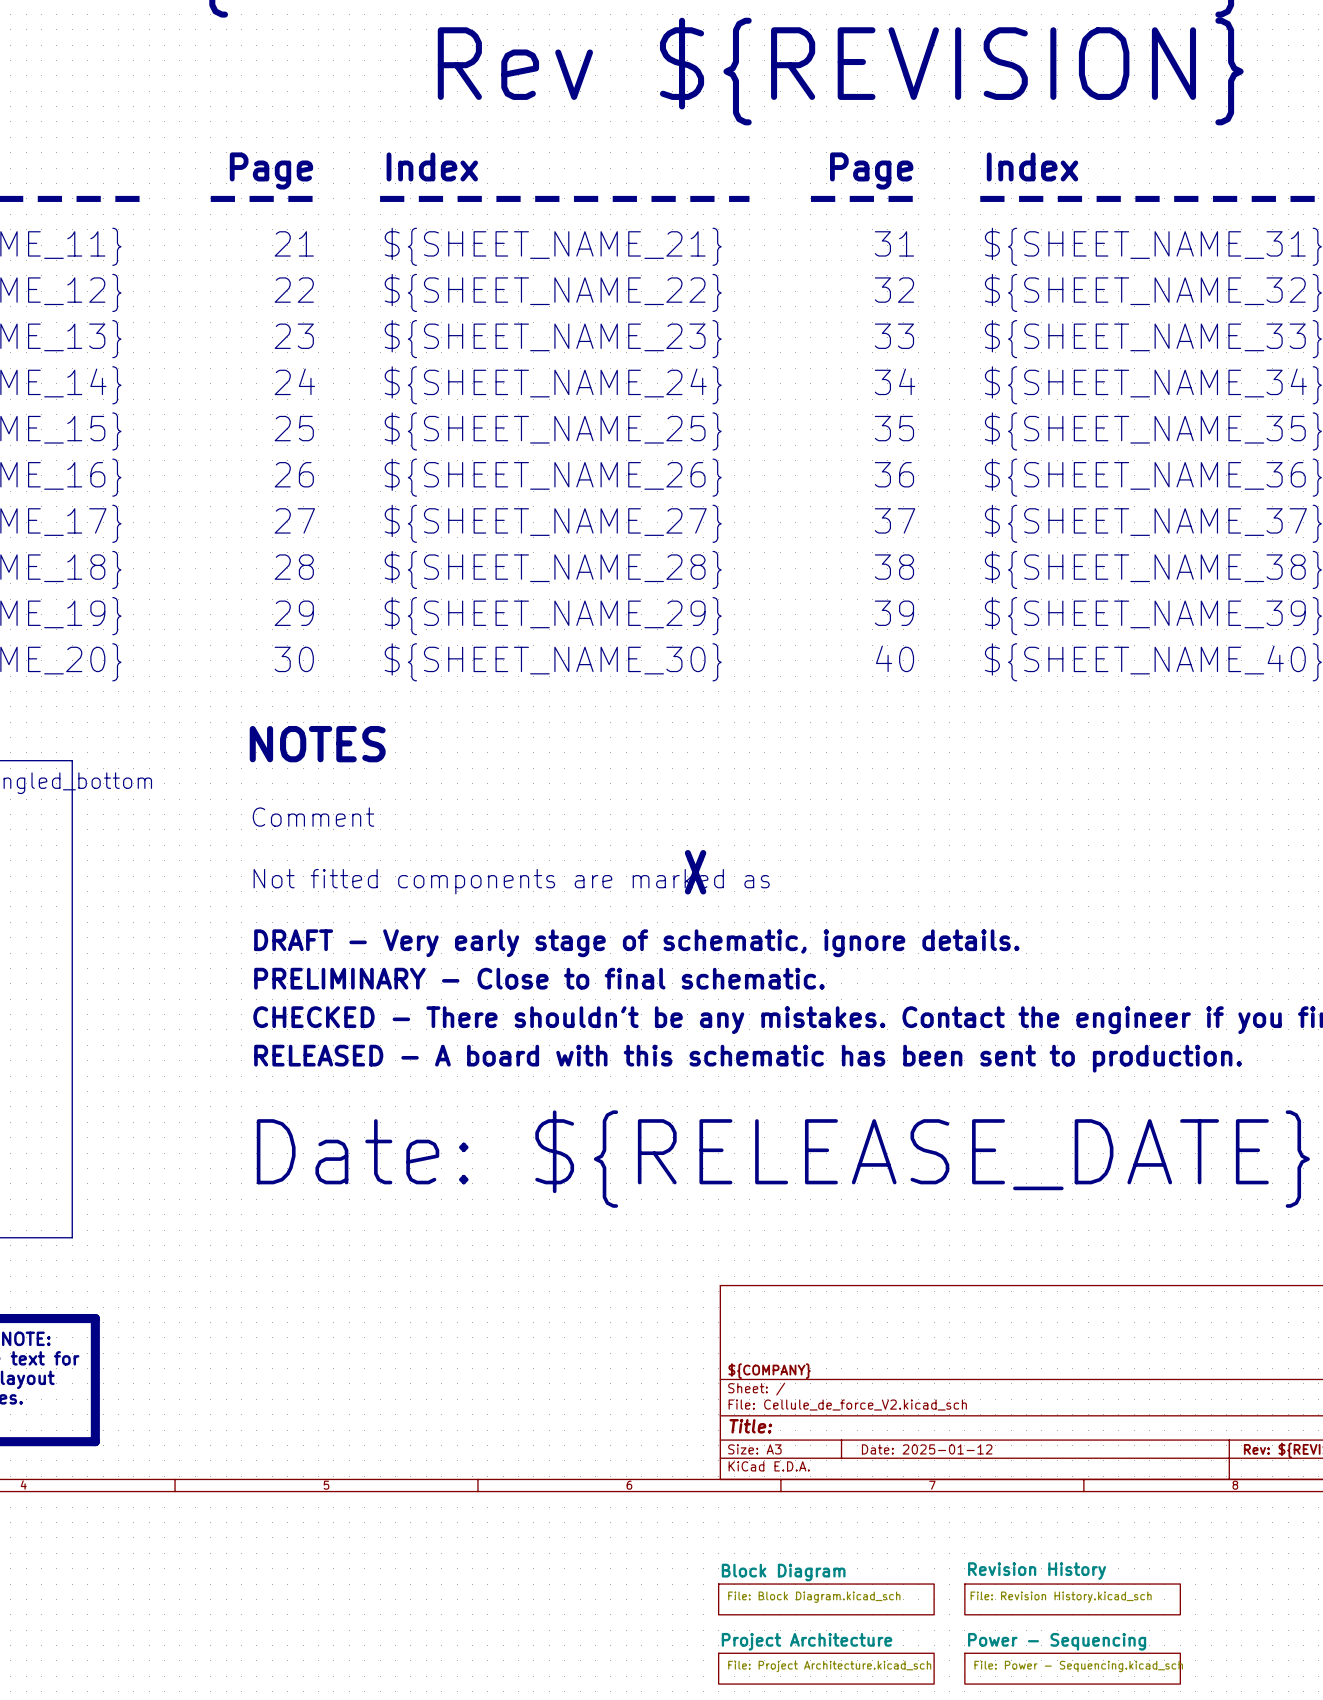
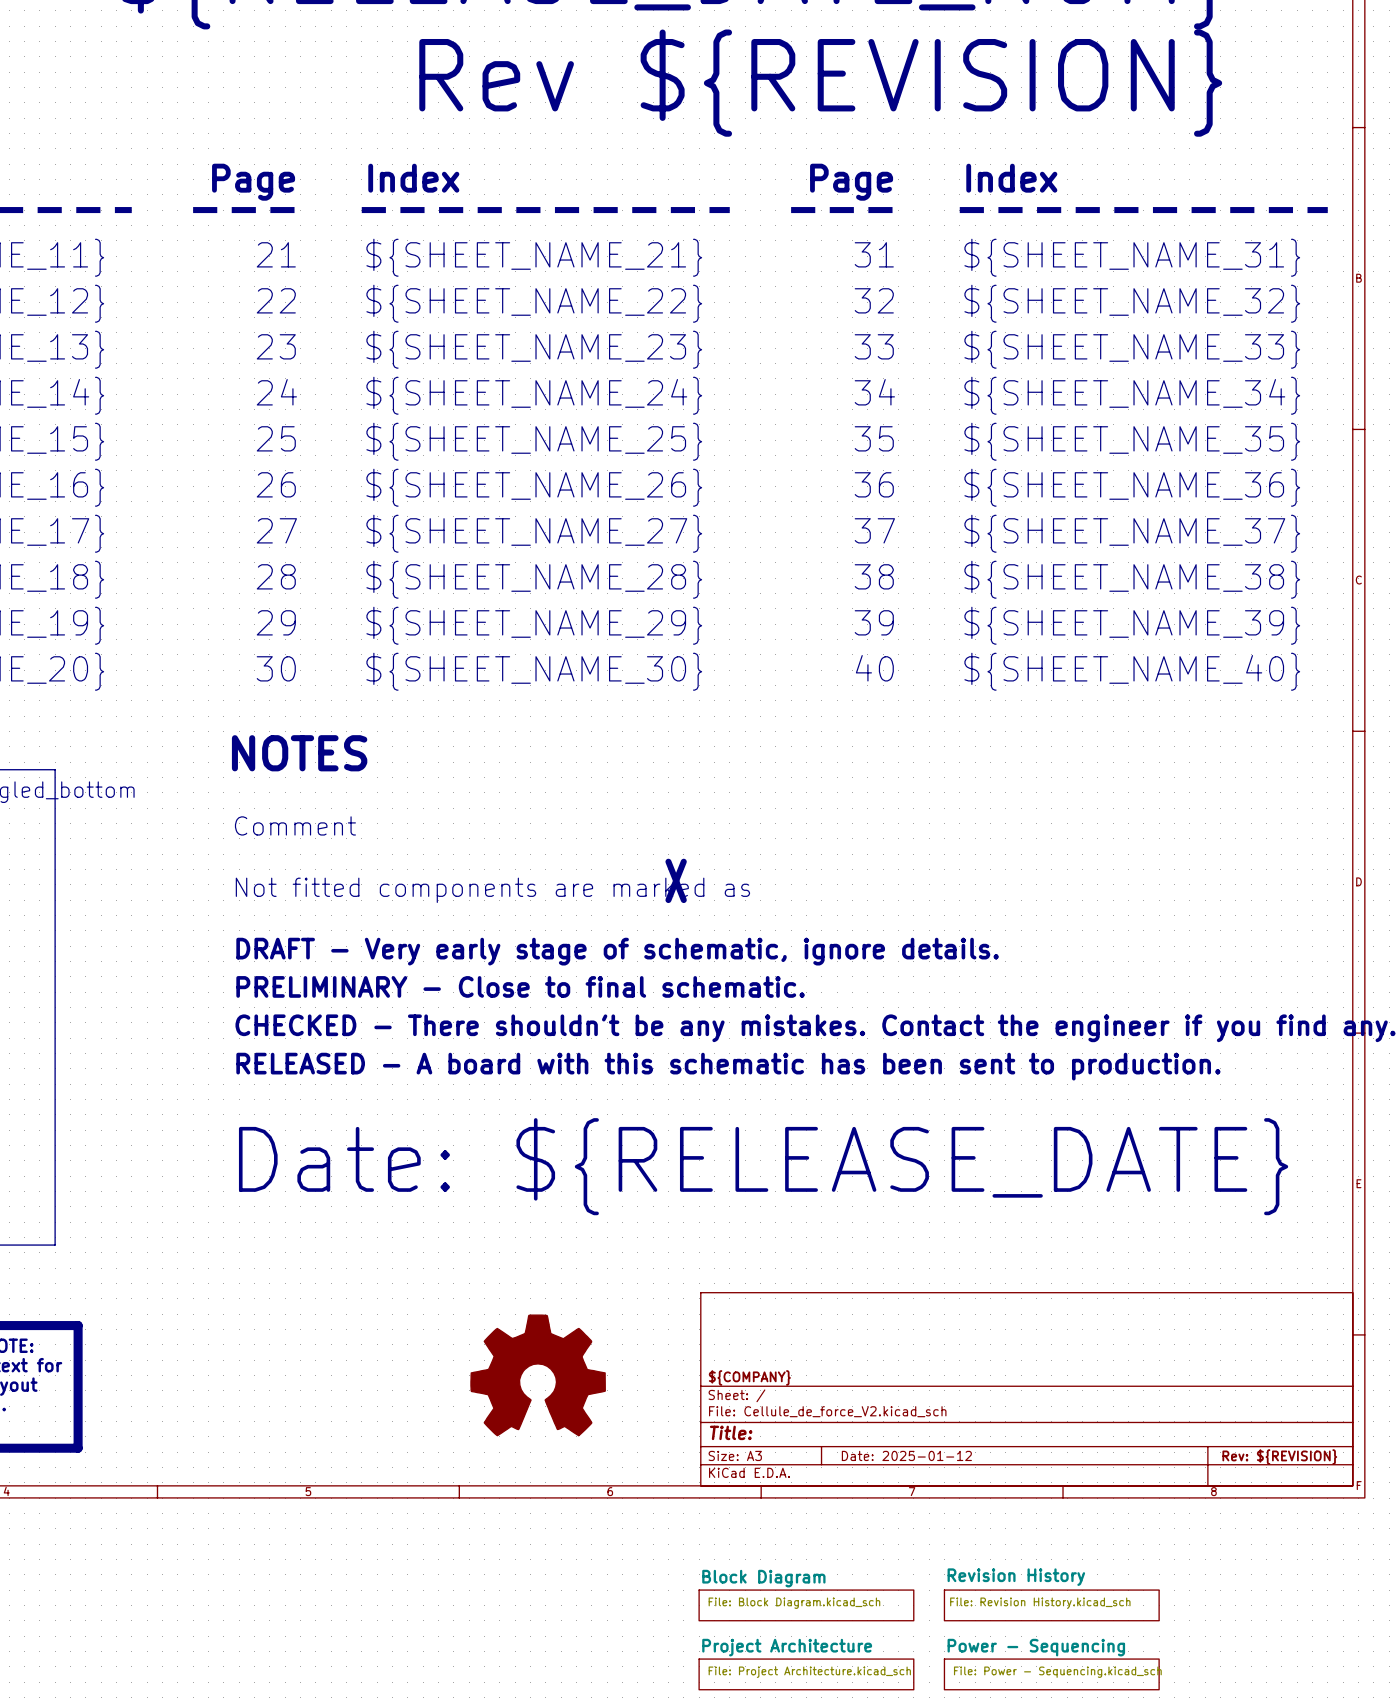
power symbol: none -> (538, 1375)

